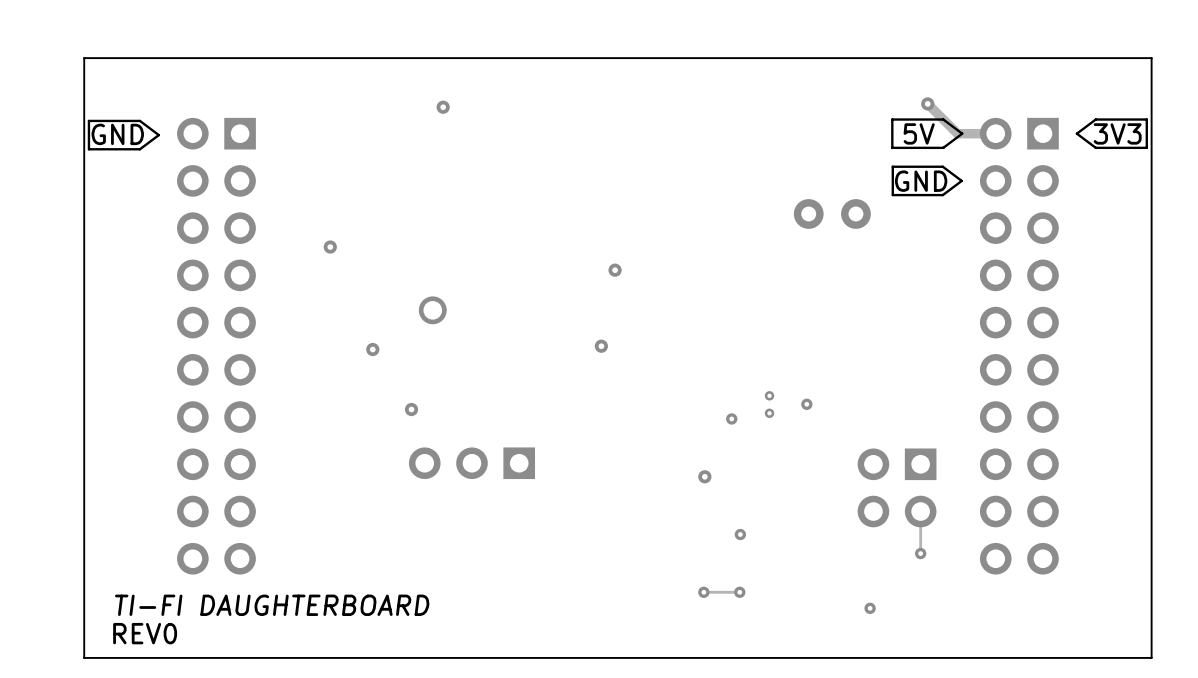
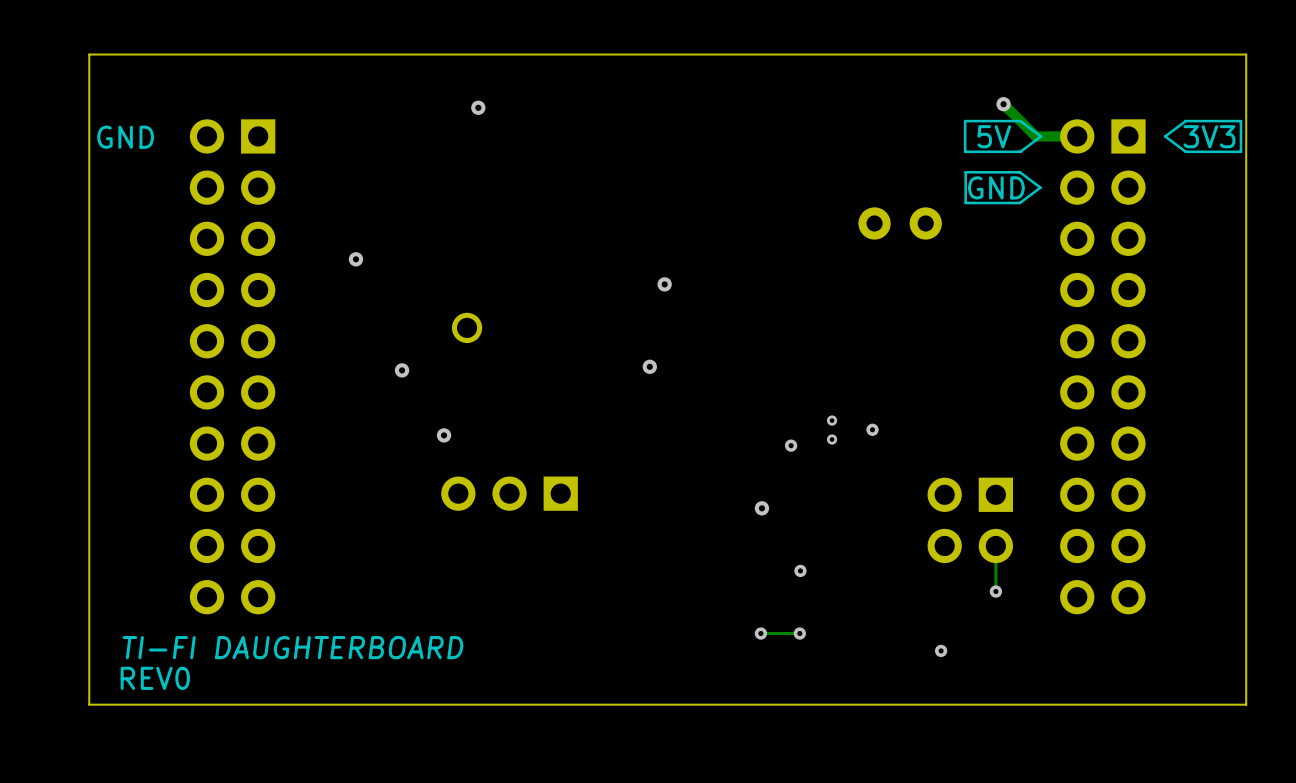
line: (139, 120) (88, 120) (88, 149) (139, 149) (158, 135) (139, 120) -> none

